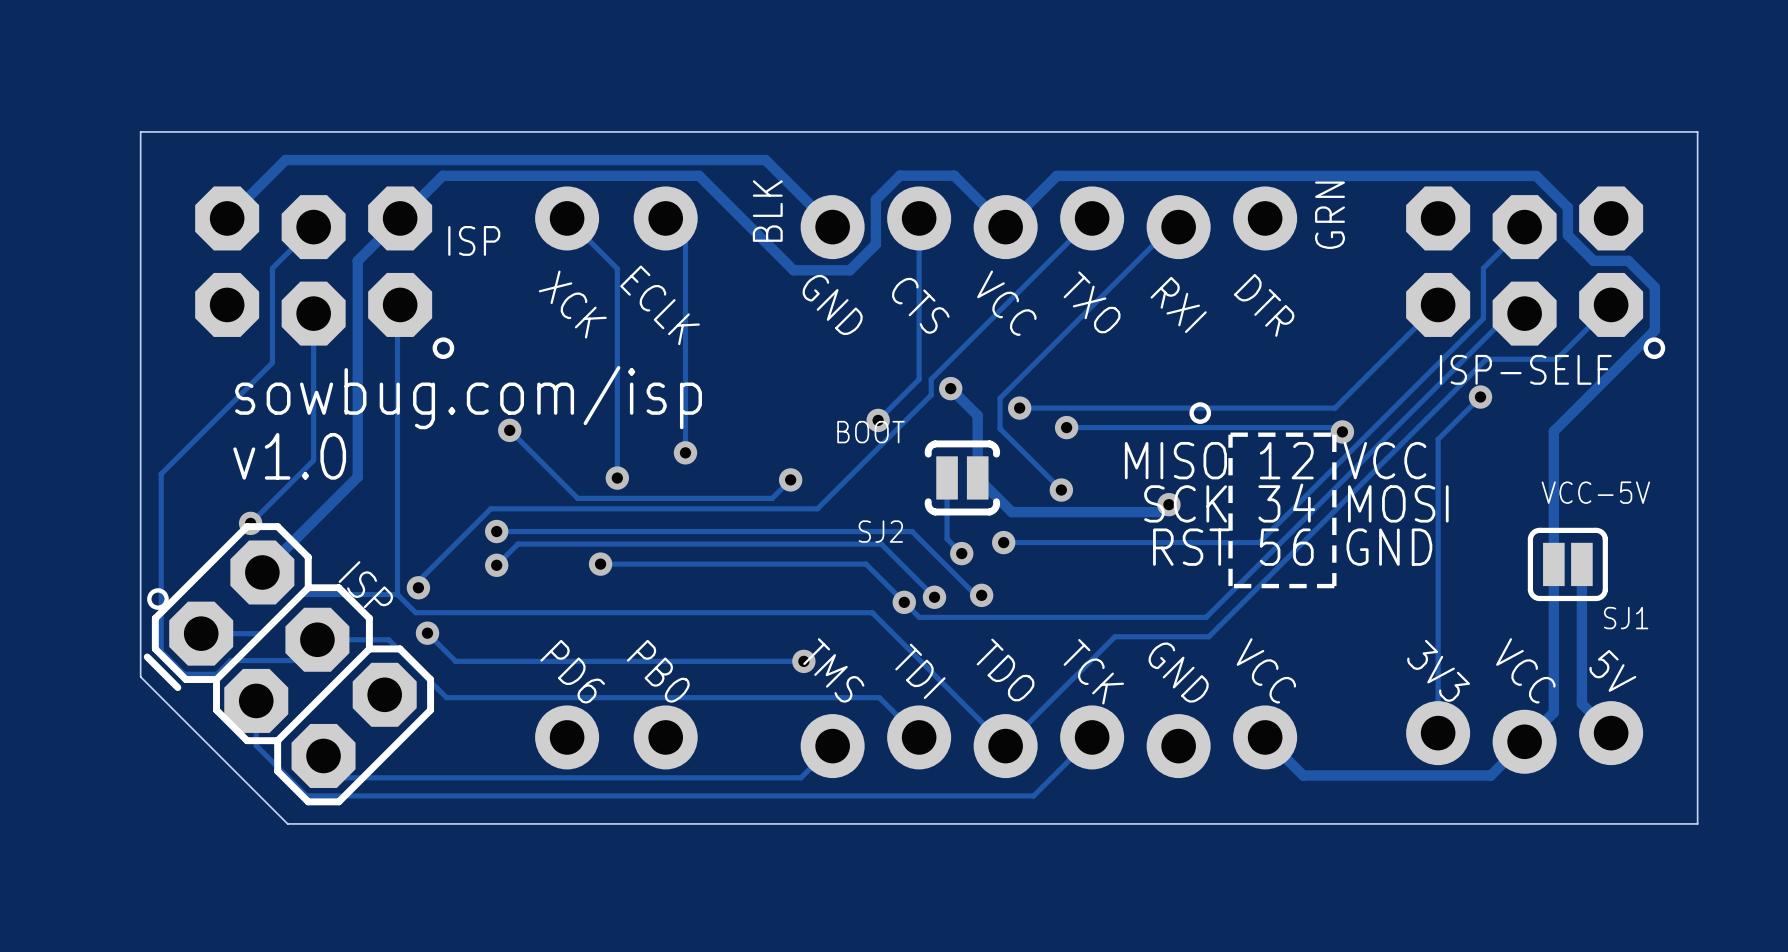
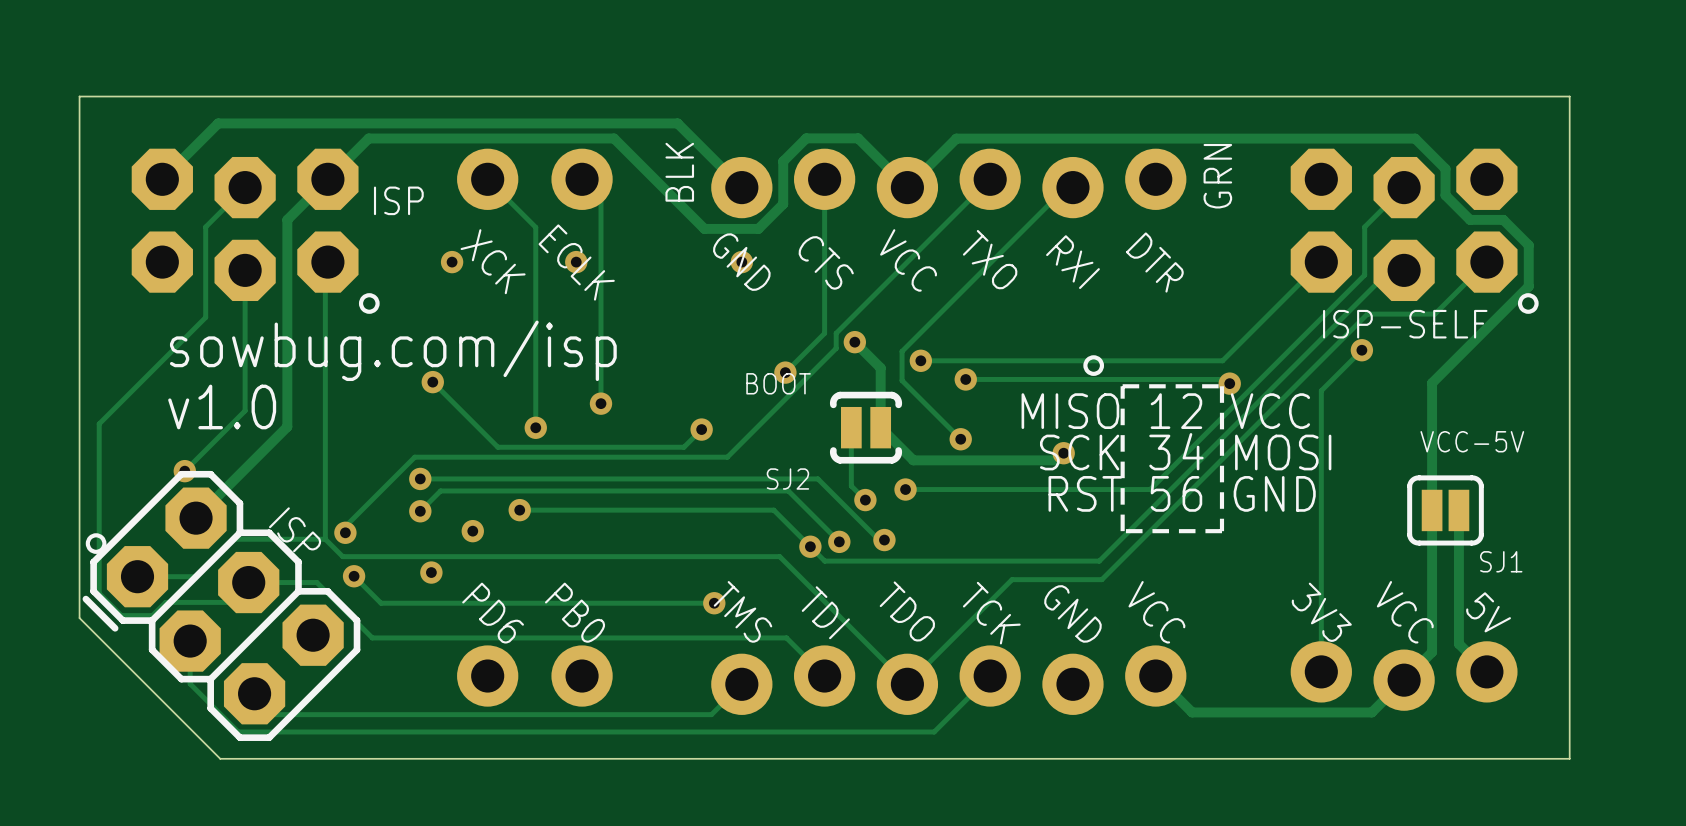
via: none -> (452, 262)
via: none -> (576, 262)
via: none -> (741, 262)
via: none -> (472, 531)
via: none -> (431, 572)

